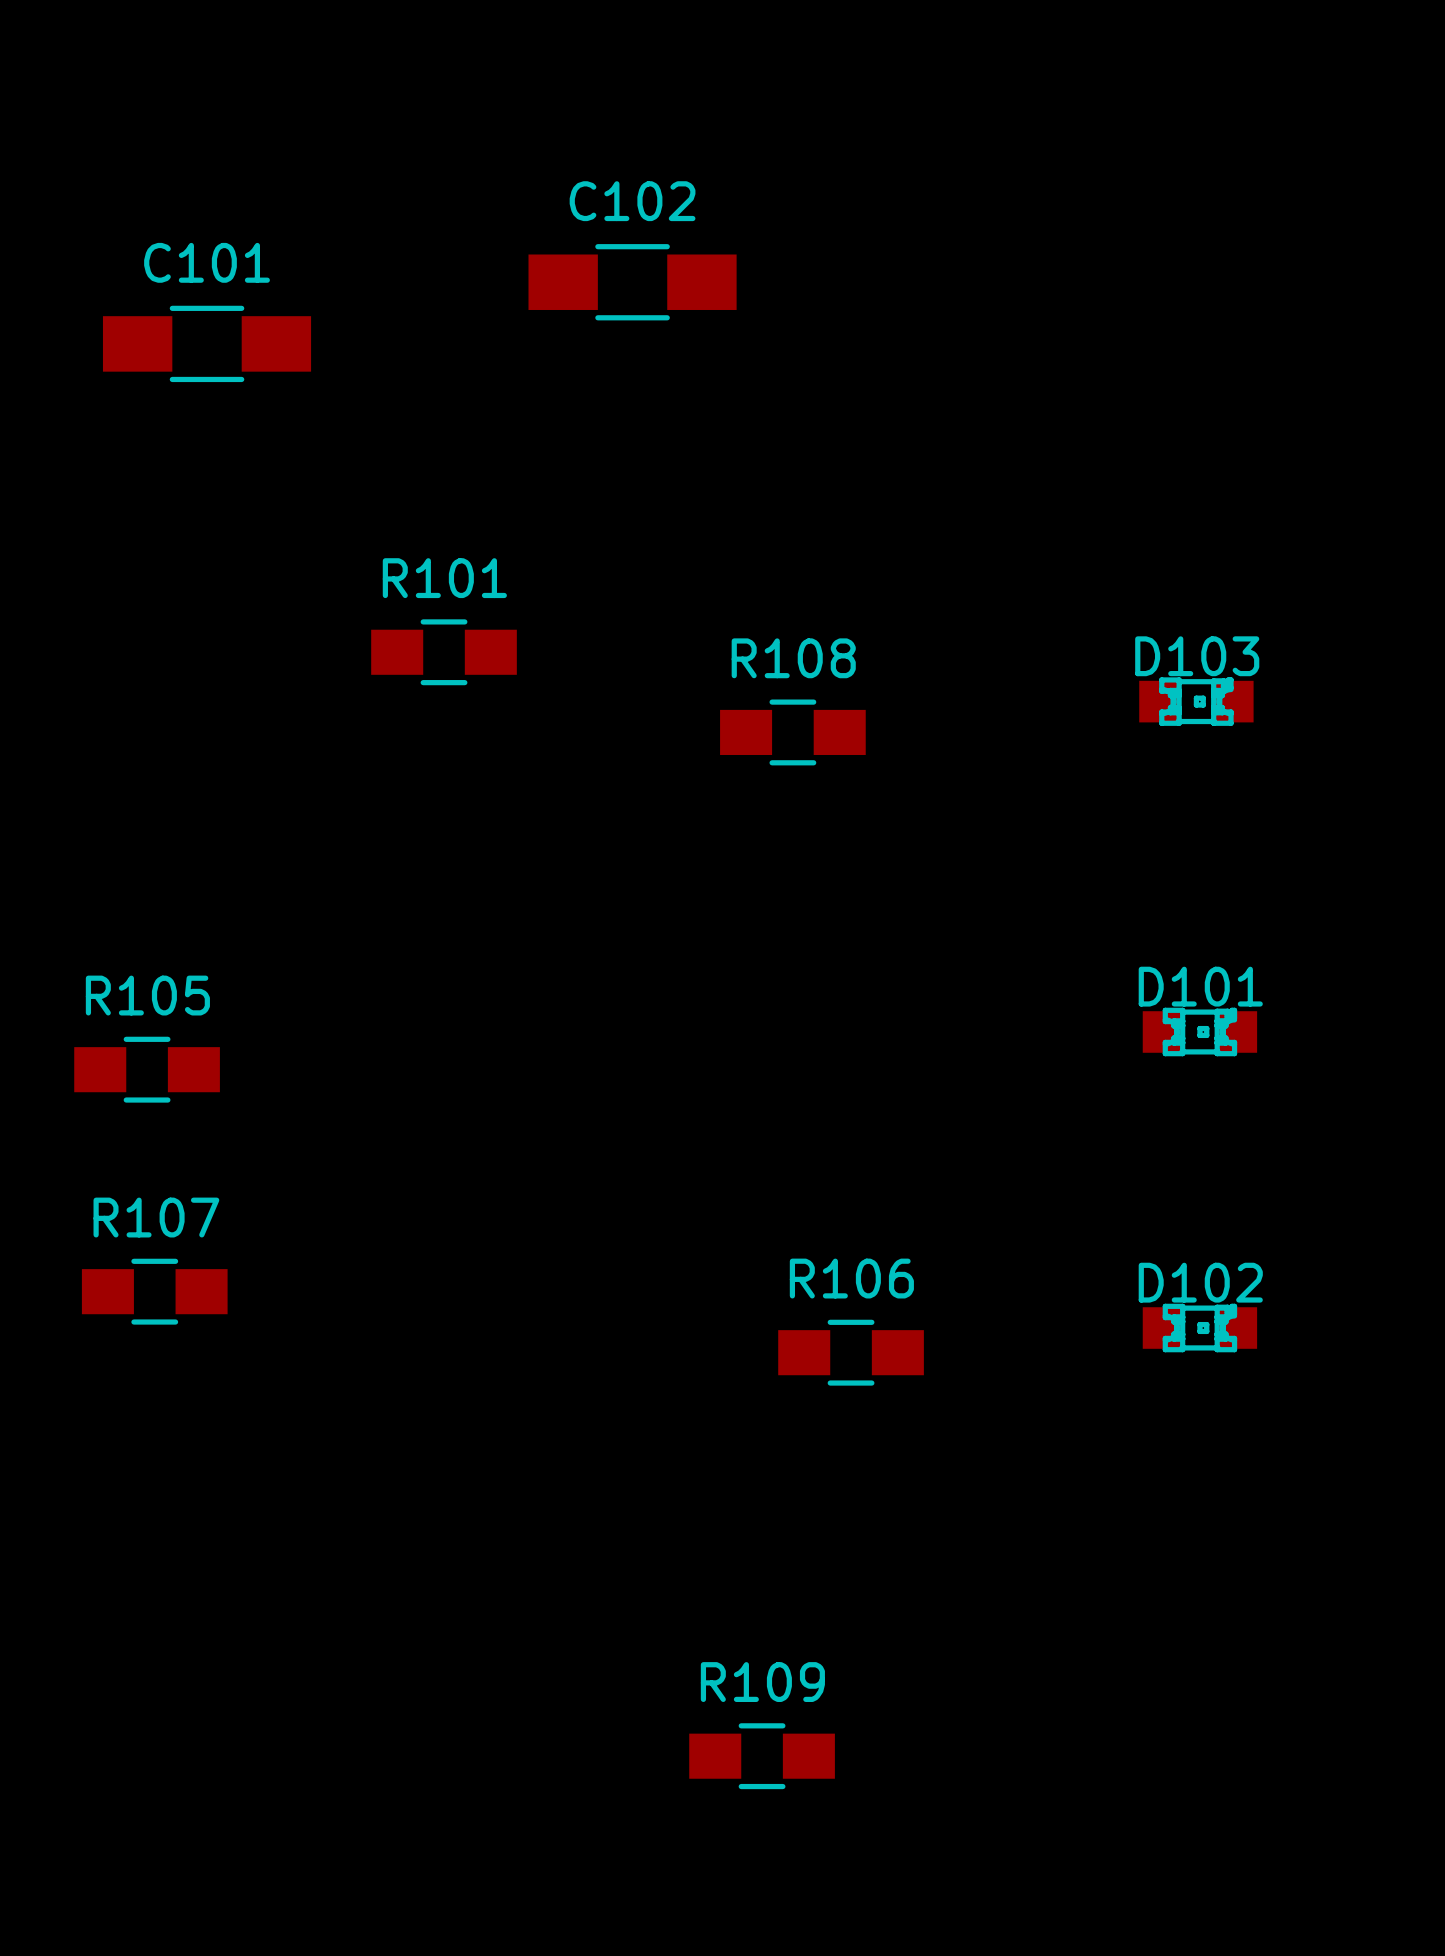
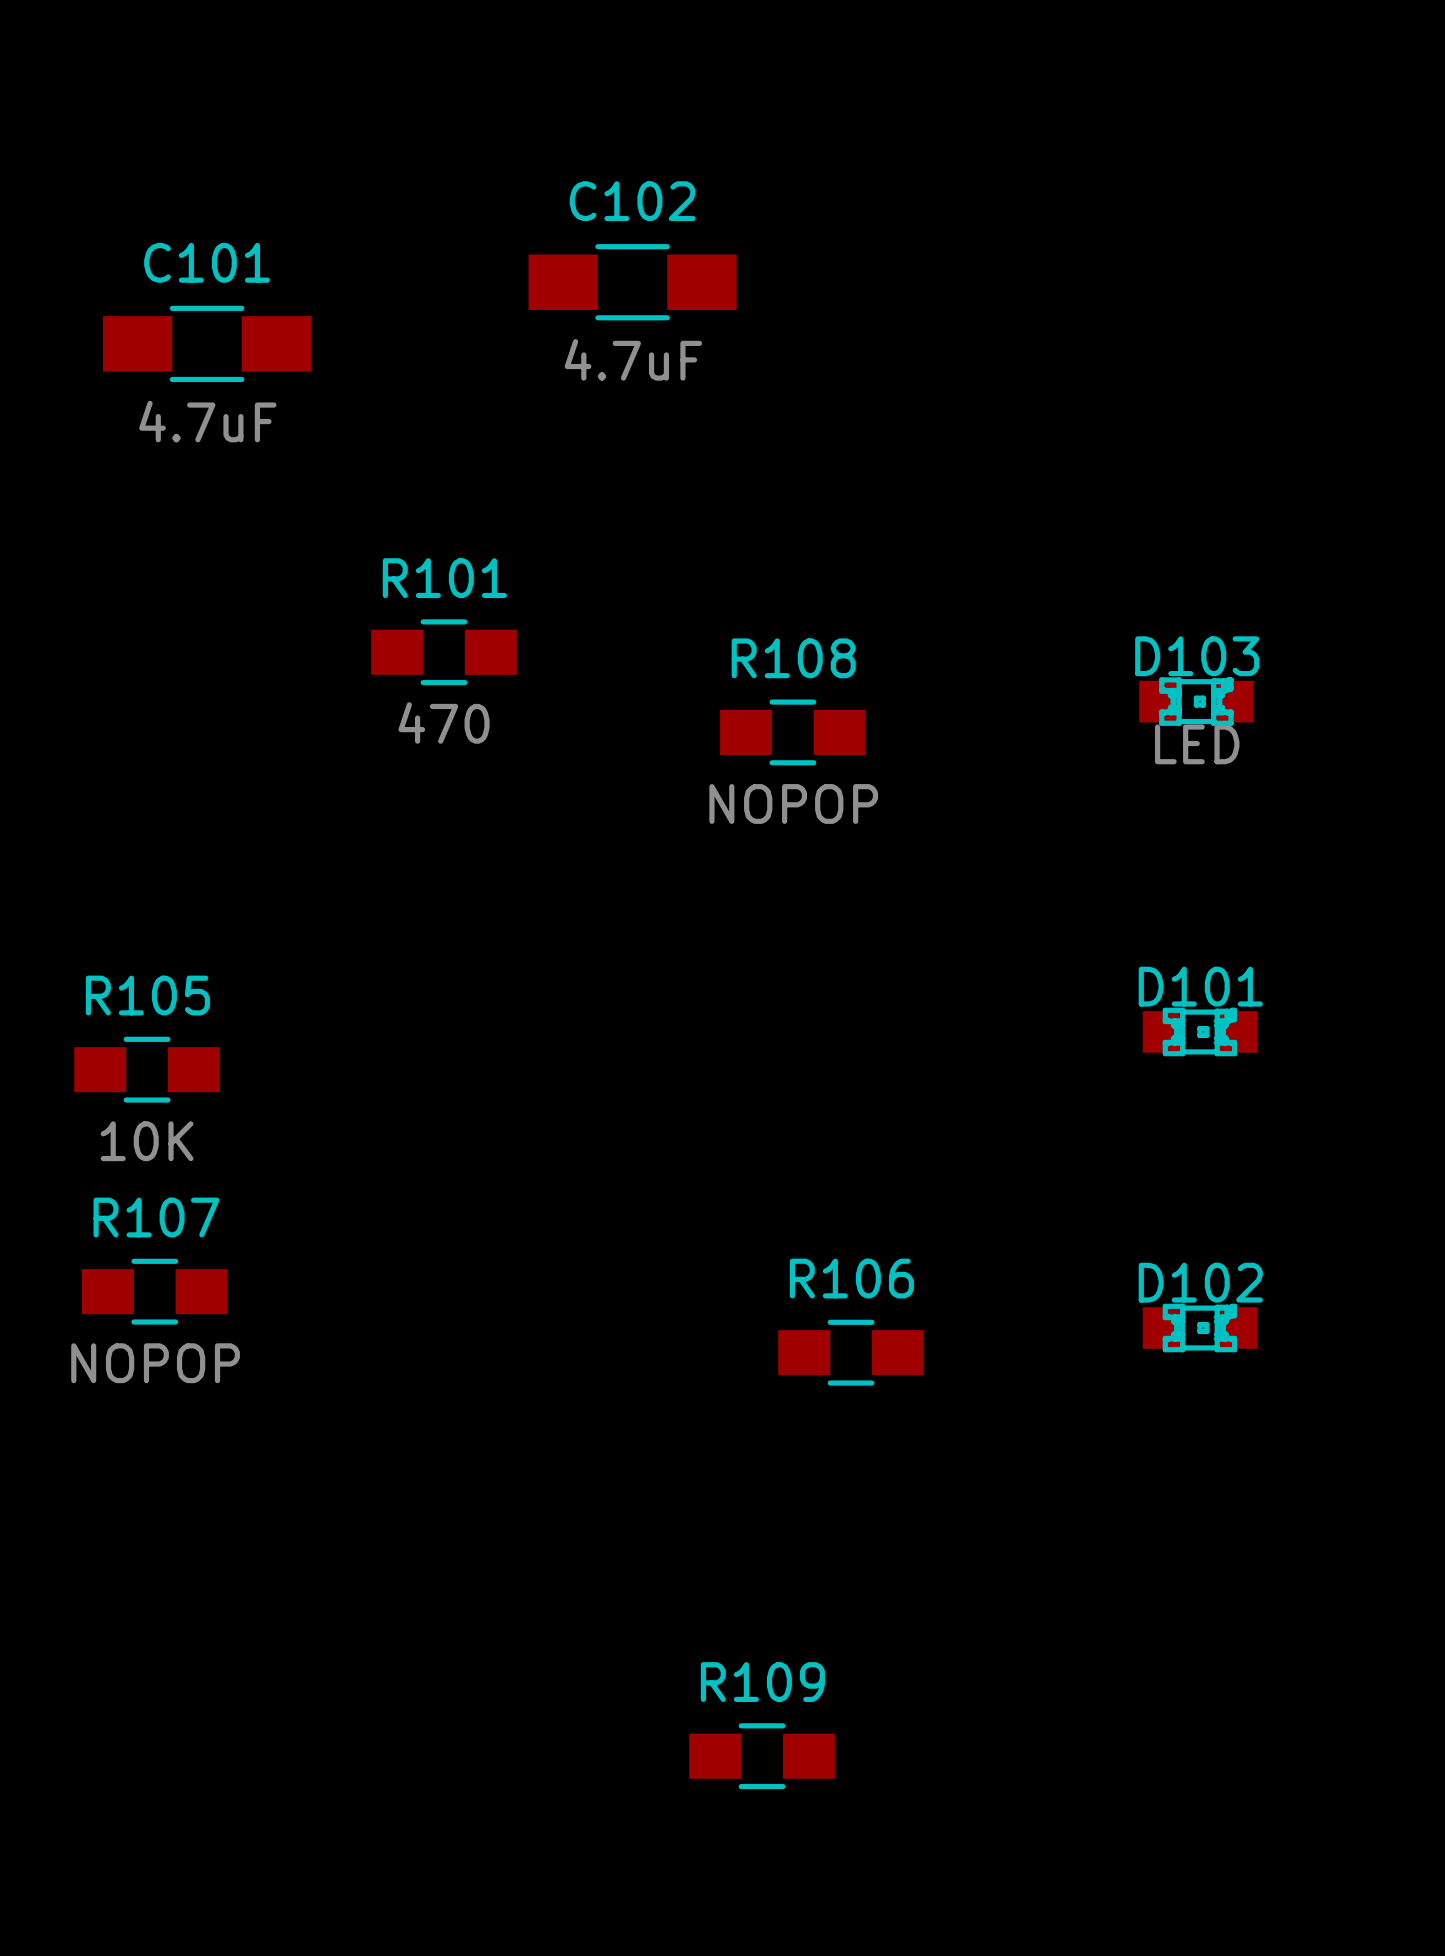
C102 value: none -> 4.7uF (633, 359)
C101 value: none -> 4.7uF (207, 421)
R101 value: none -> 470 (444, 722)
D103 value: none -> LED (1197, 744)
R108 value: none -> NOPOP (793, 803)
R105 value: none -> 10K (147, 1141)
R107 value: none -> NOPOP (155, 1363)

